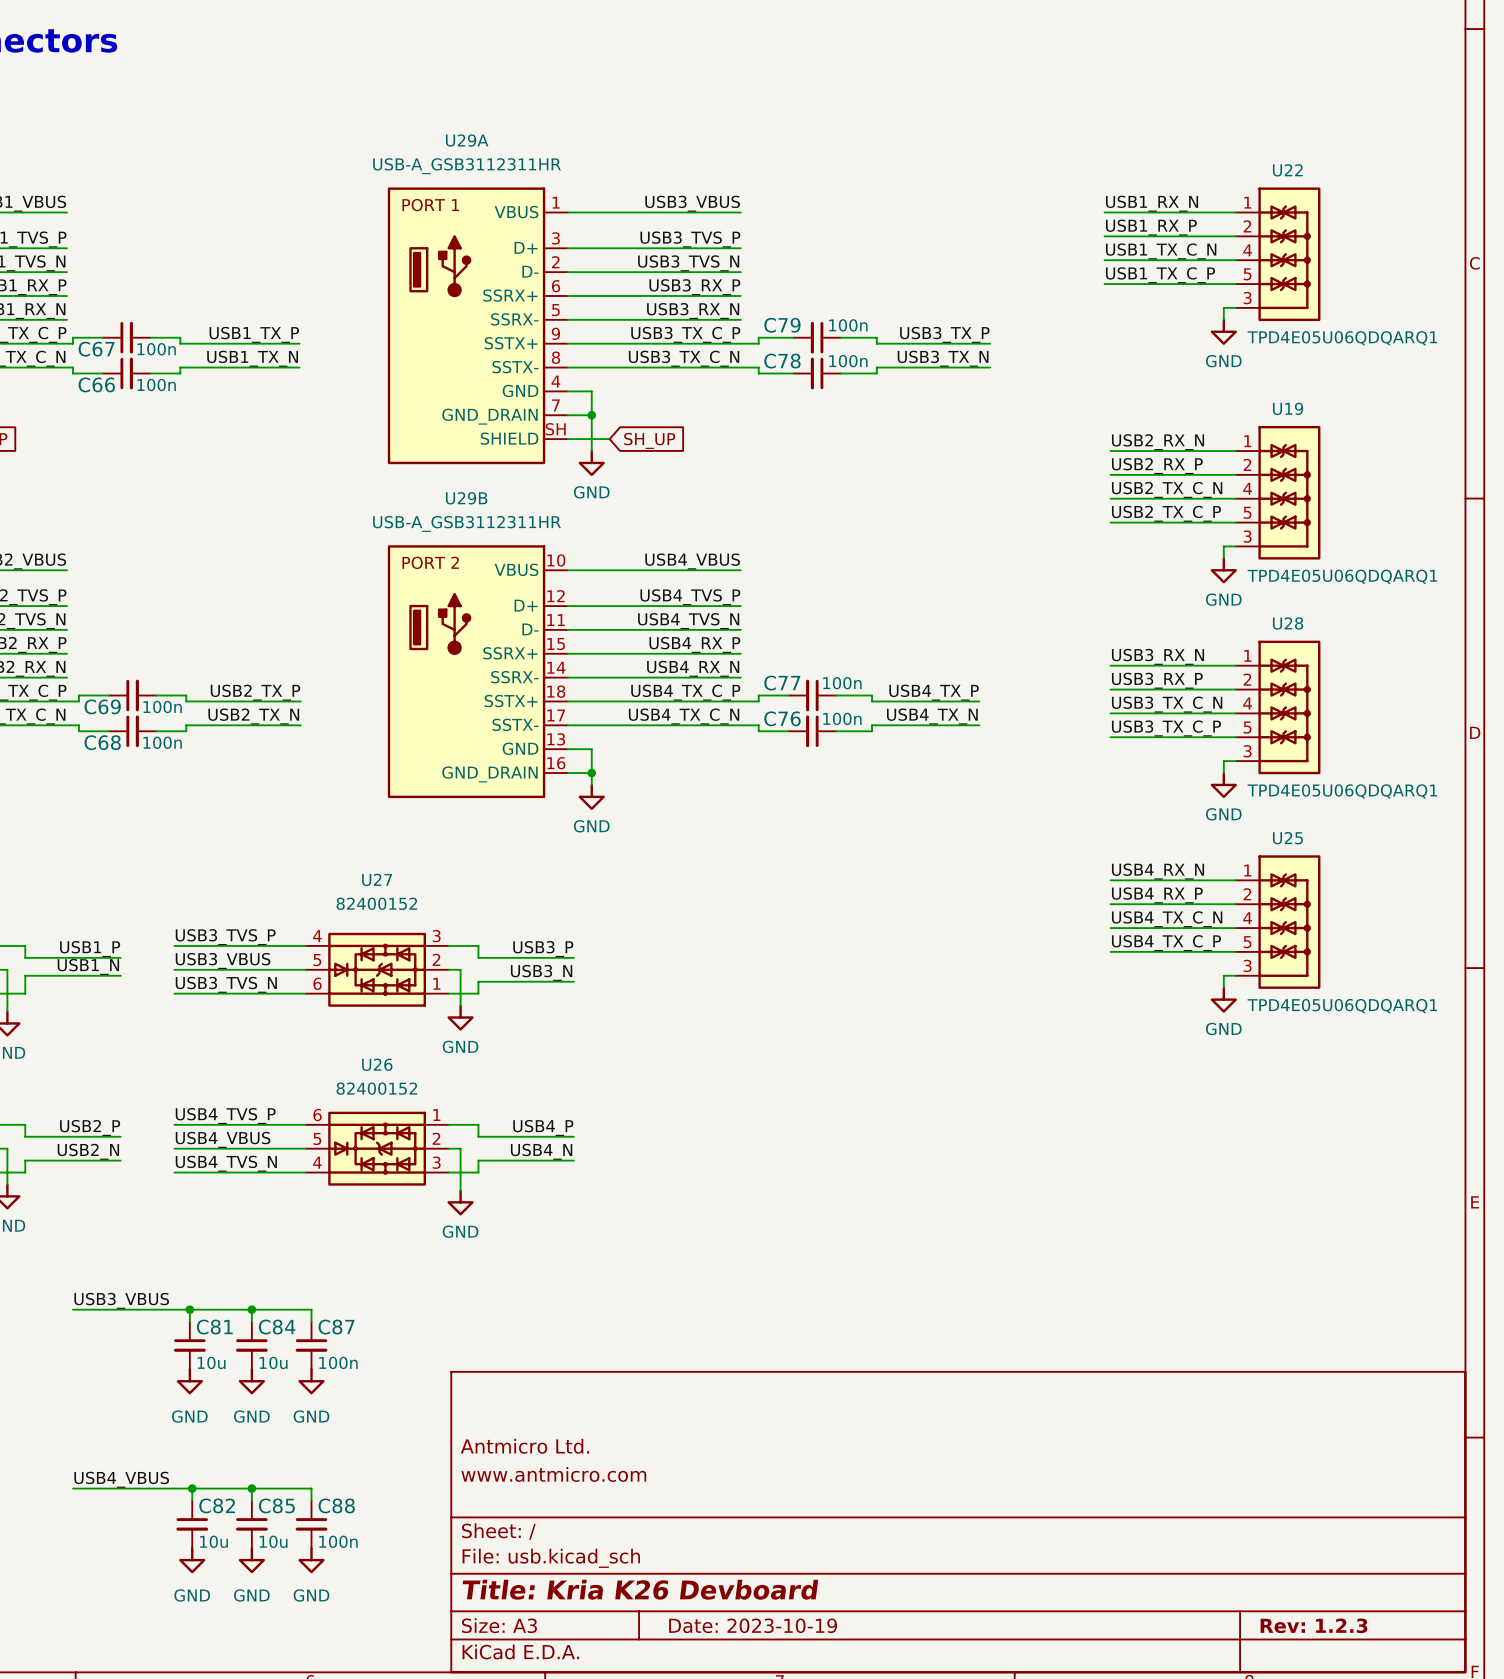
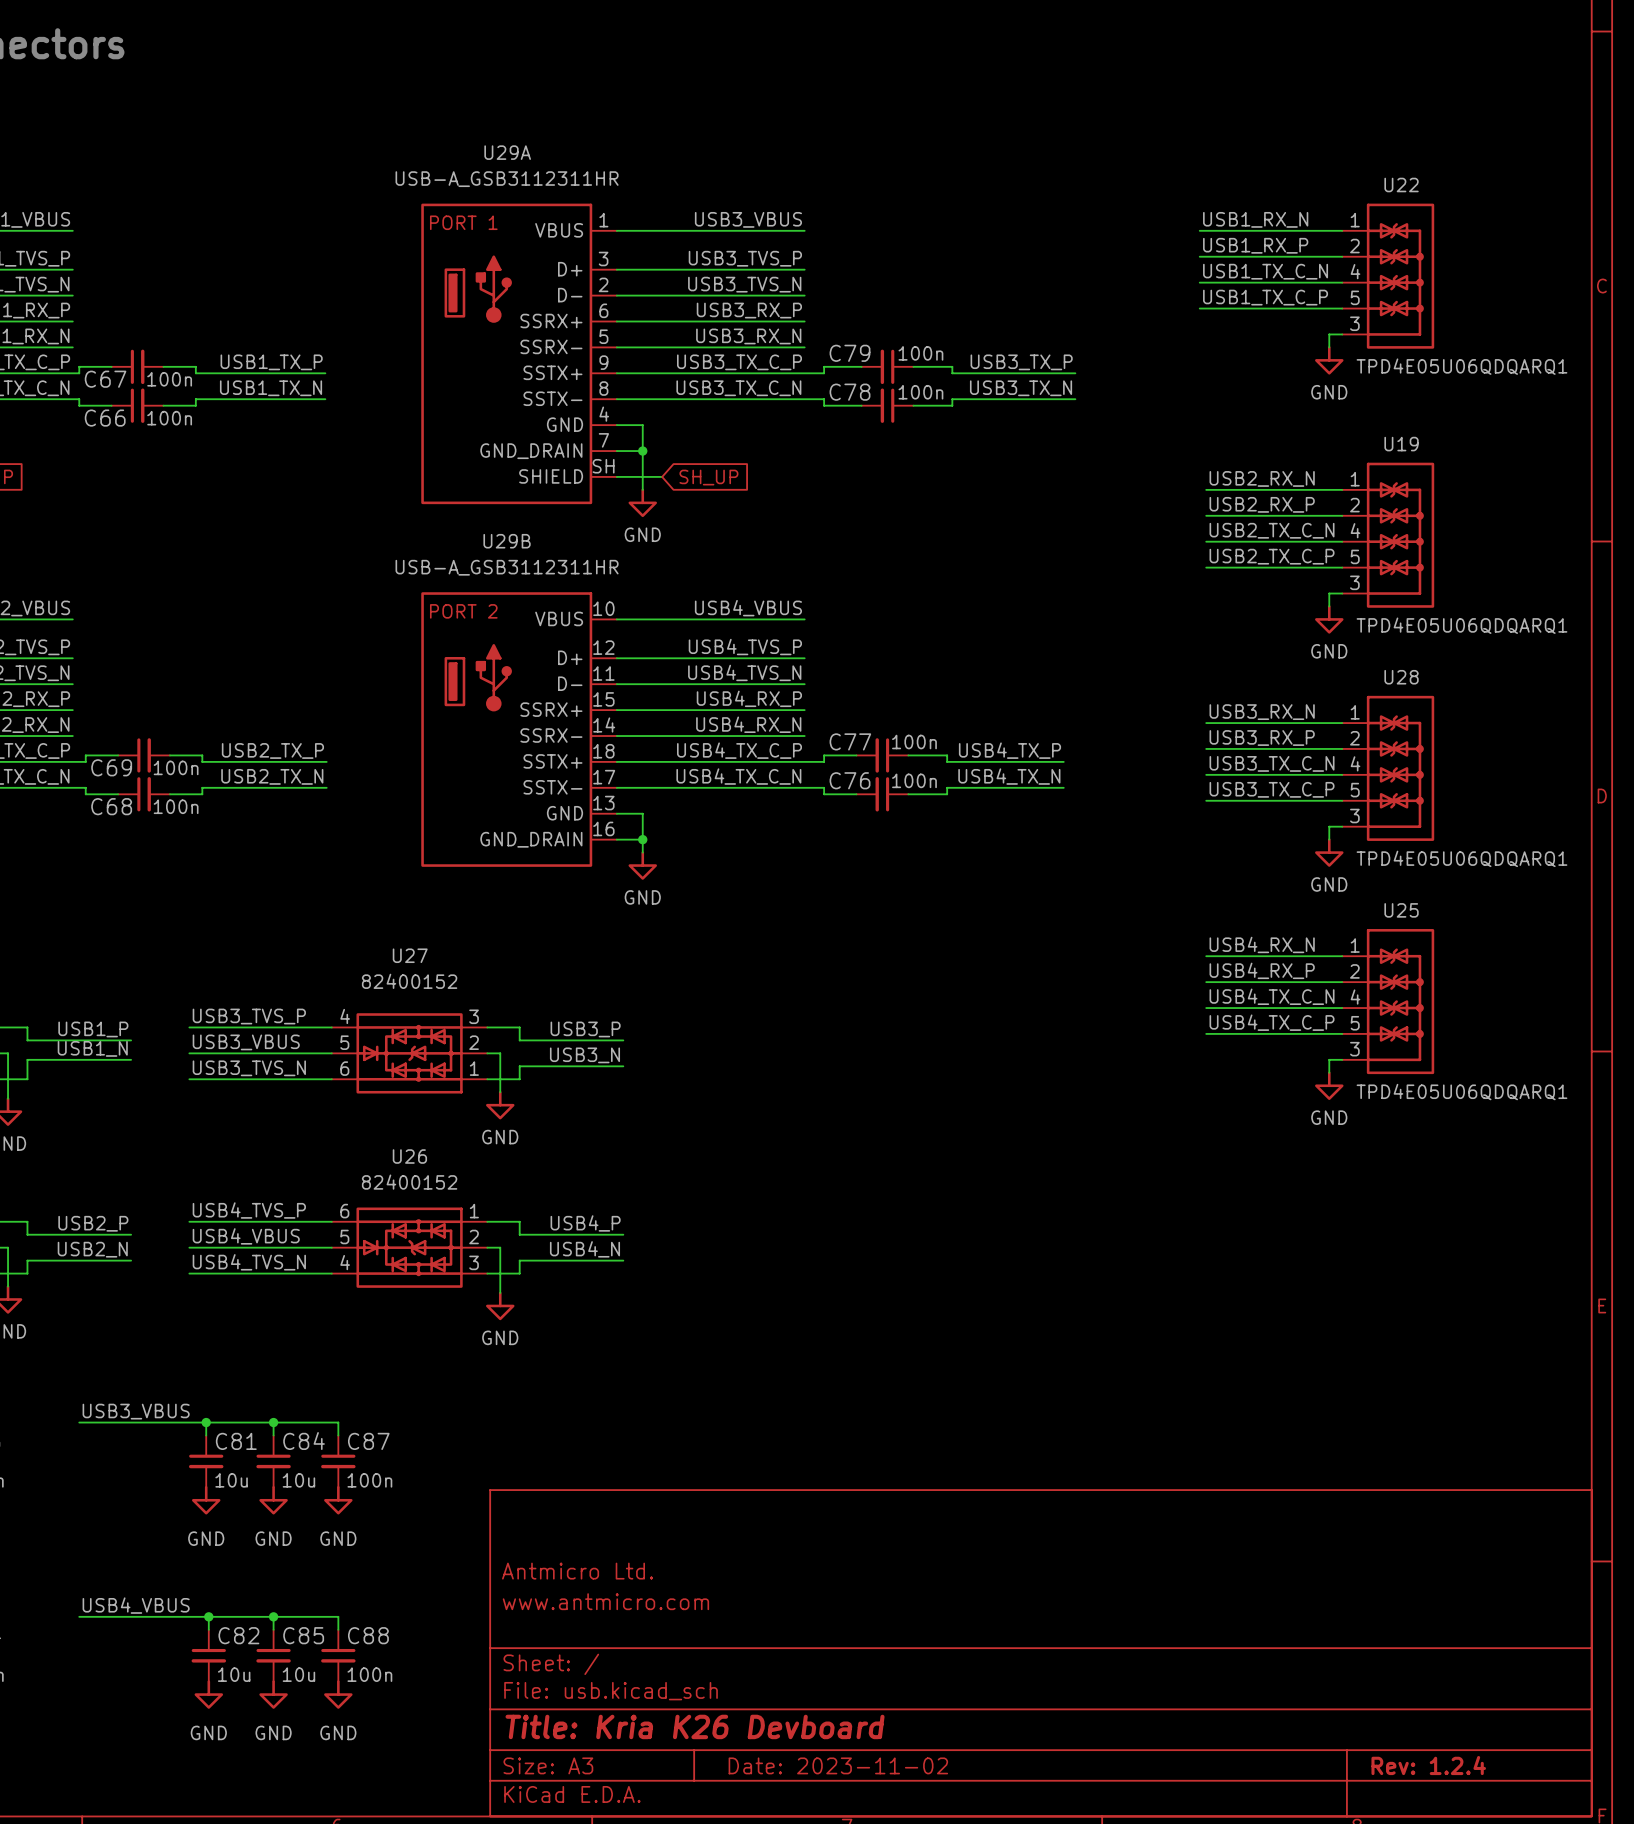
title block: Date: 2023-10-19 (753, 1625) -> Date: 2023-11-02 (838, 1765)
title block: Rev: 1.2.3 (1313, 1625) -> Rev: 1.2.4 (1428, 1765)

